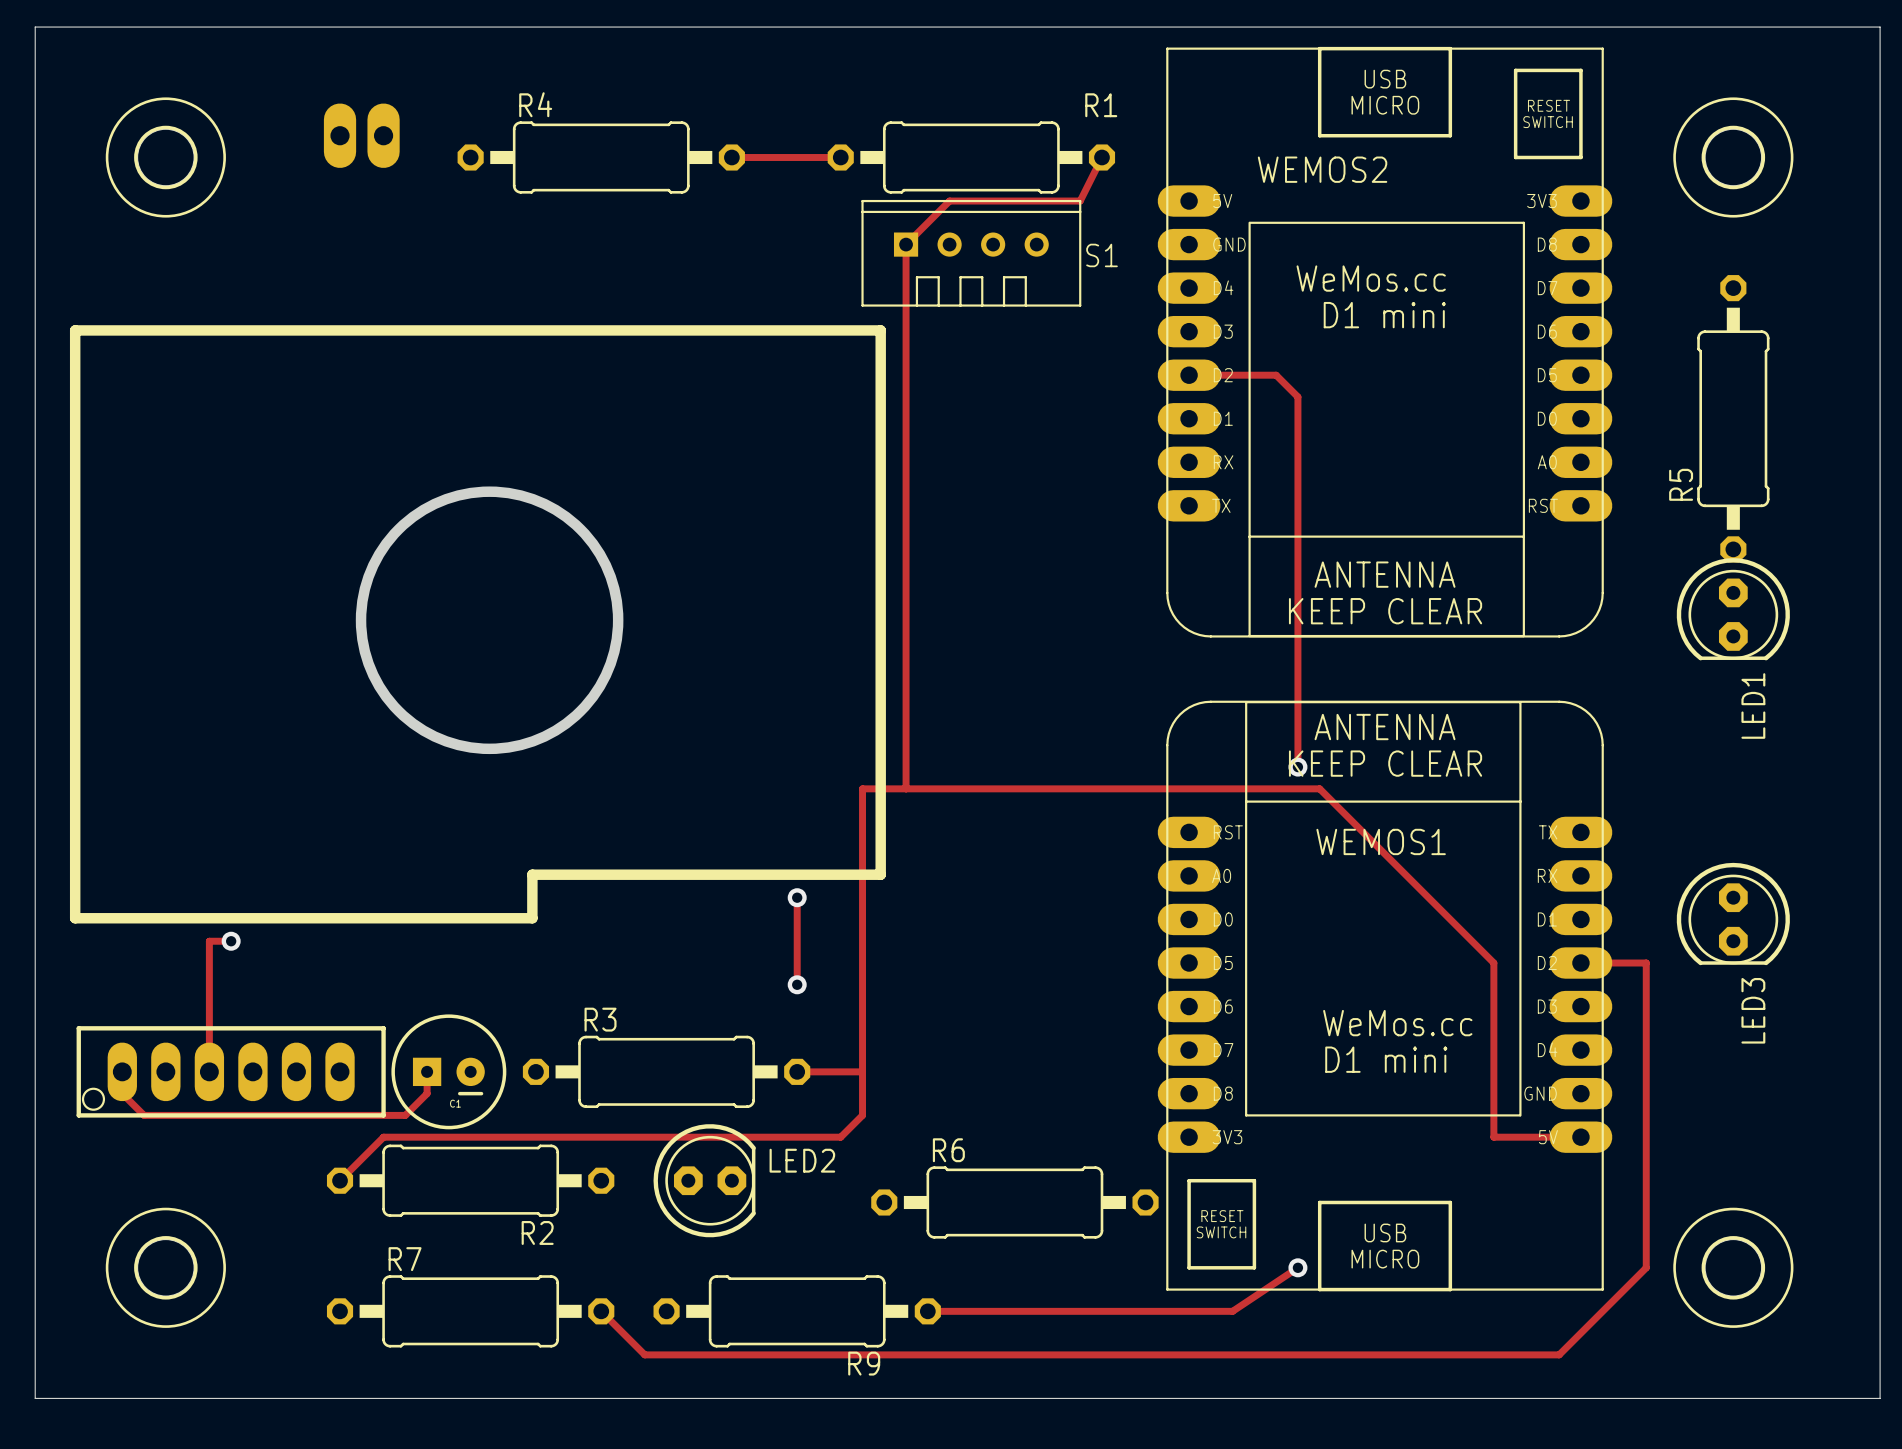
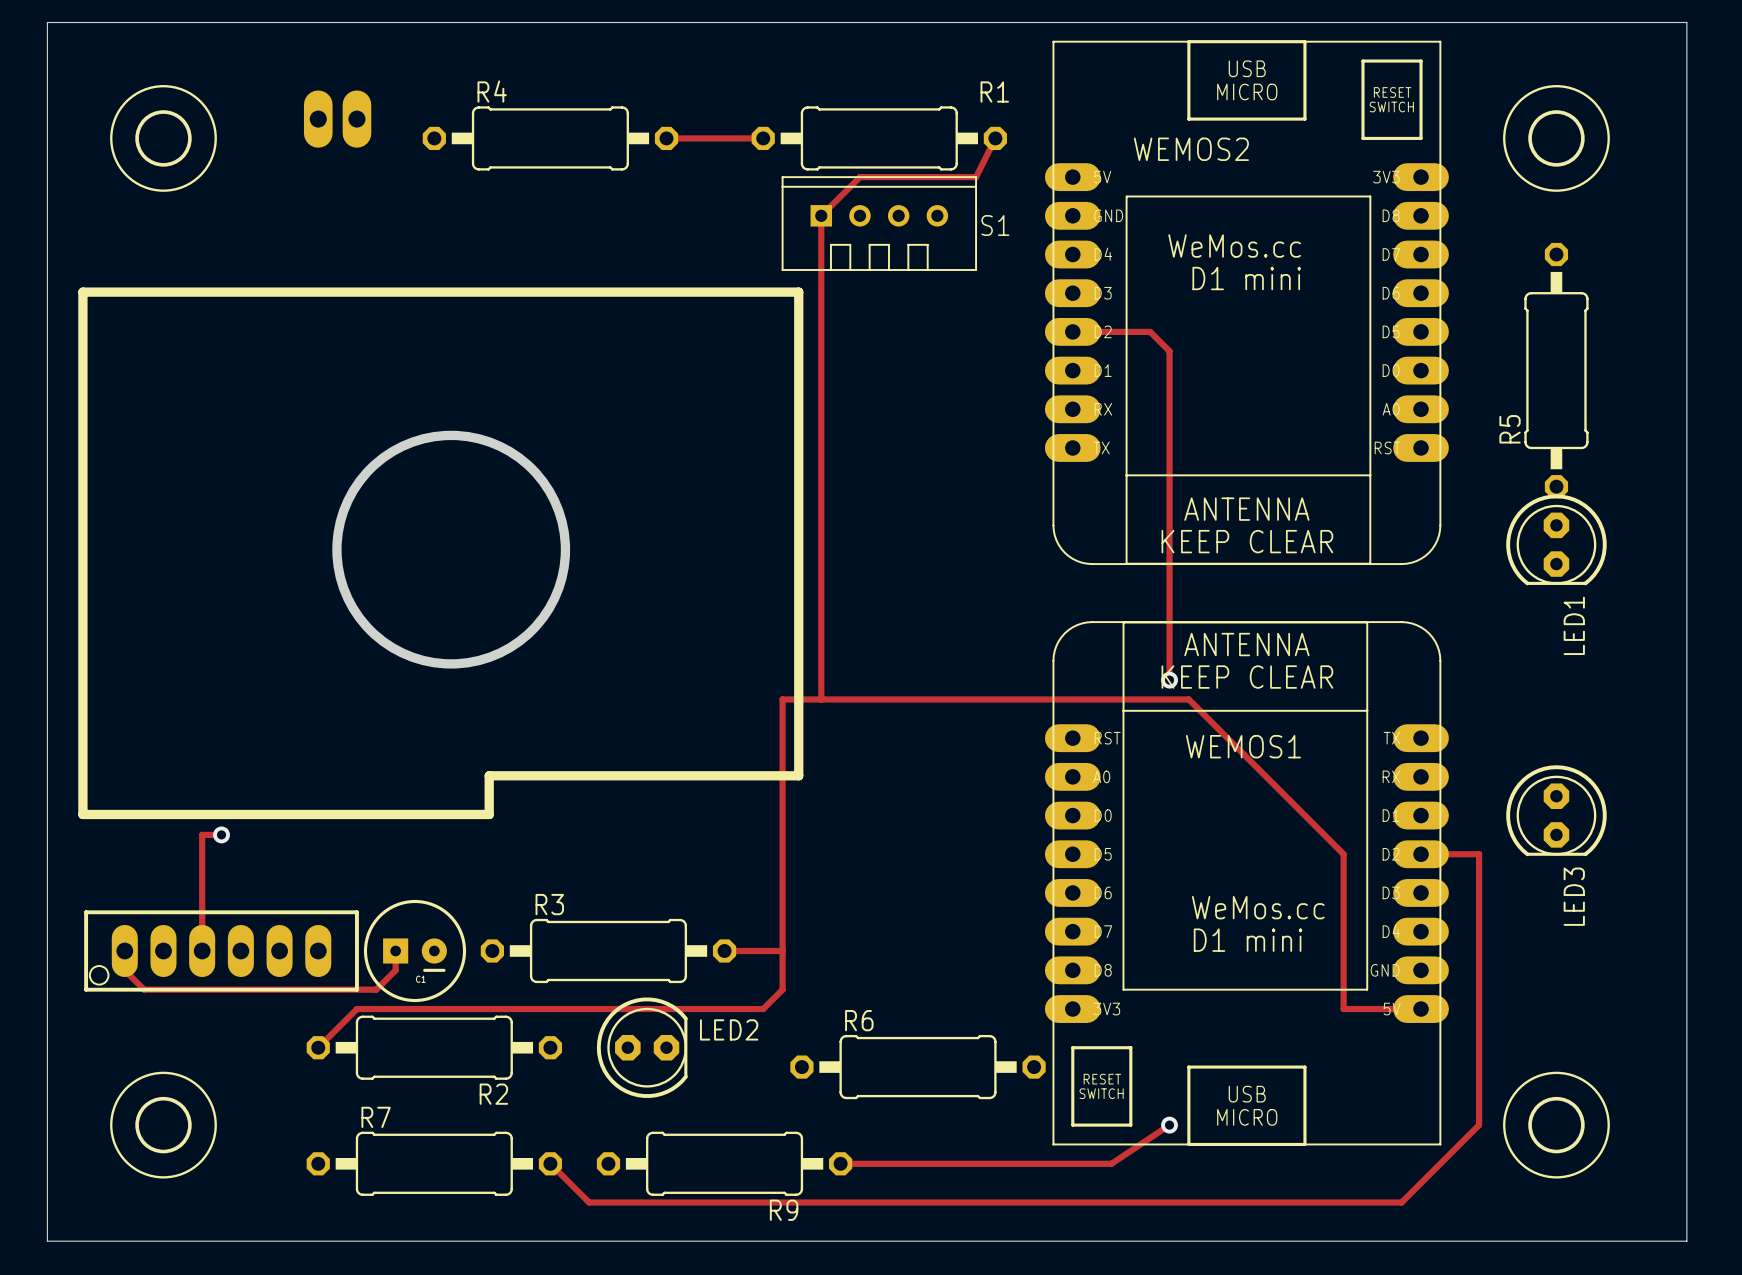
track: (797, 897) (797, 984) -> none
via: (797, 897) -> none
via: (797, 984) -> none

